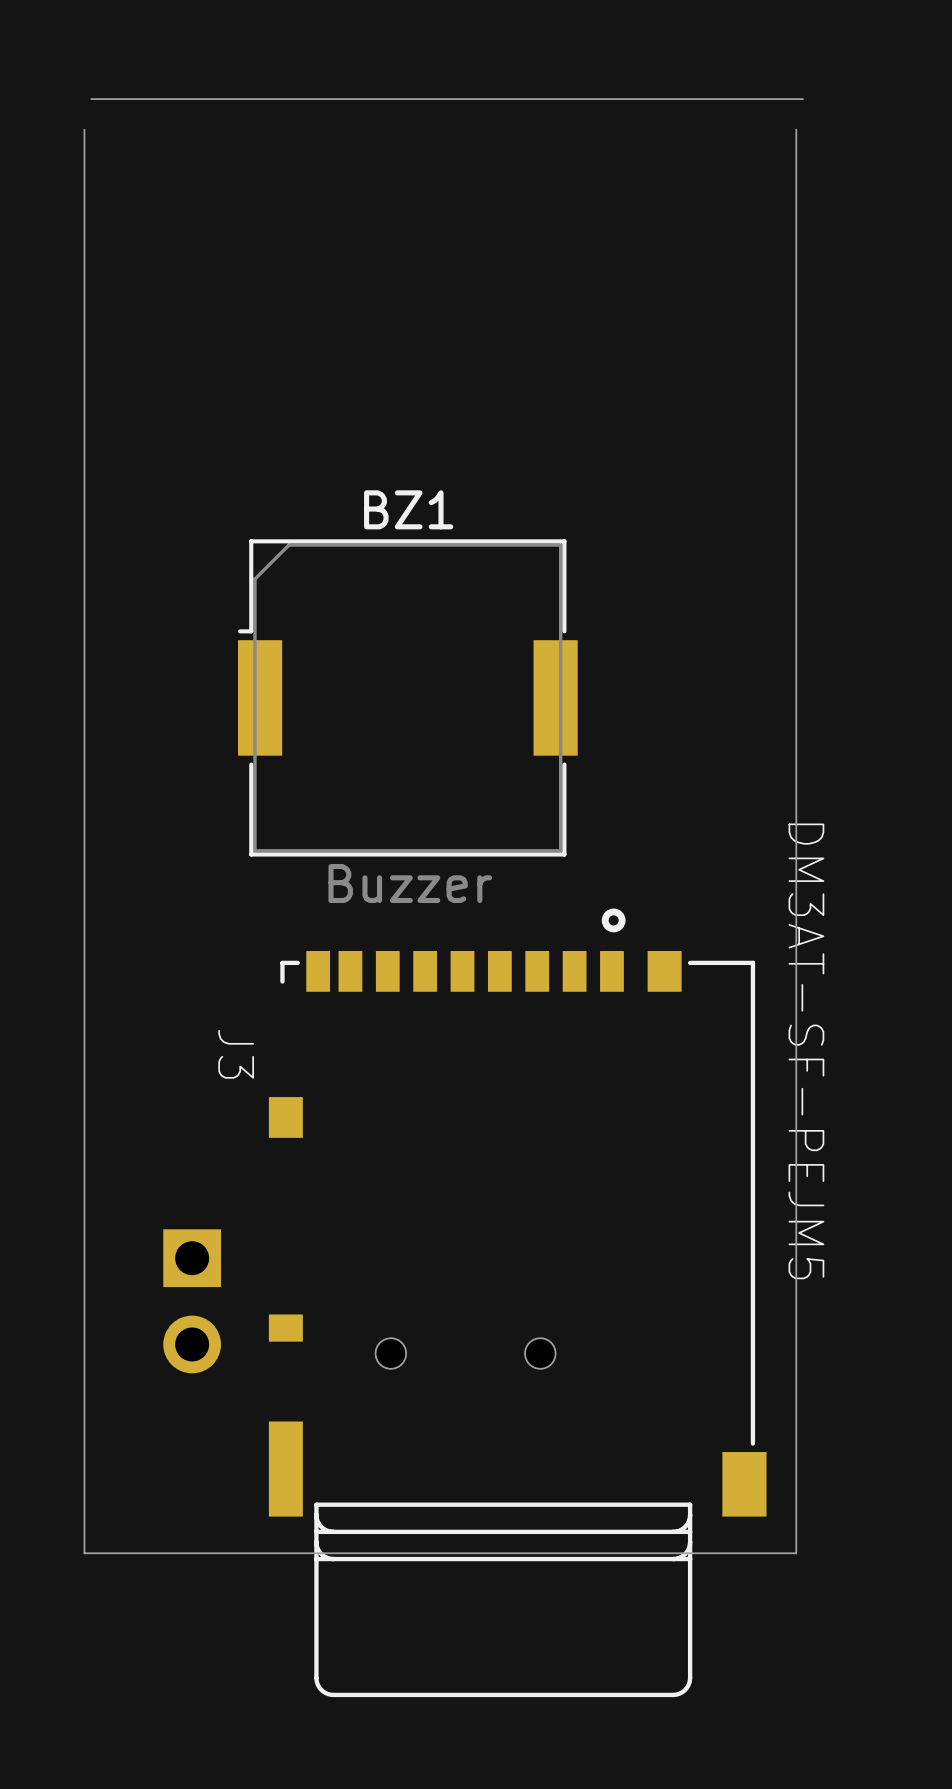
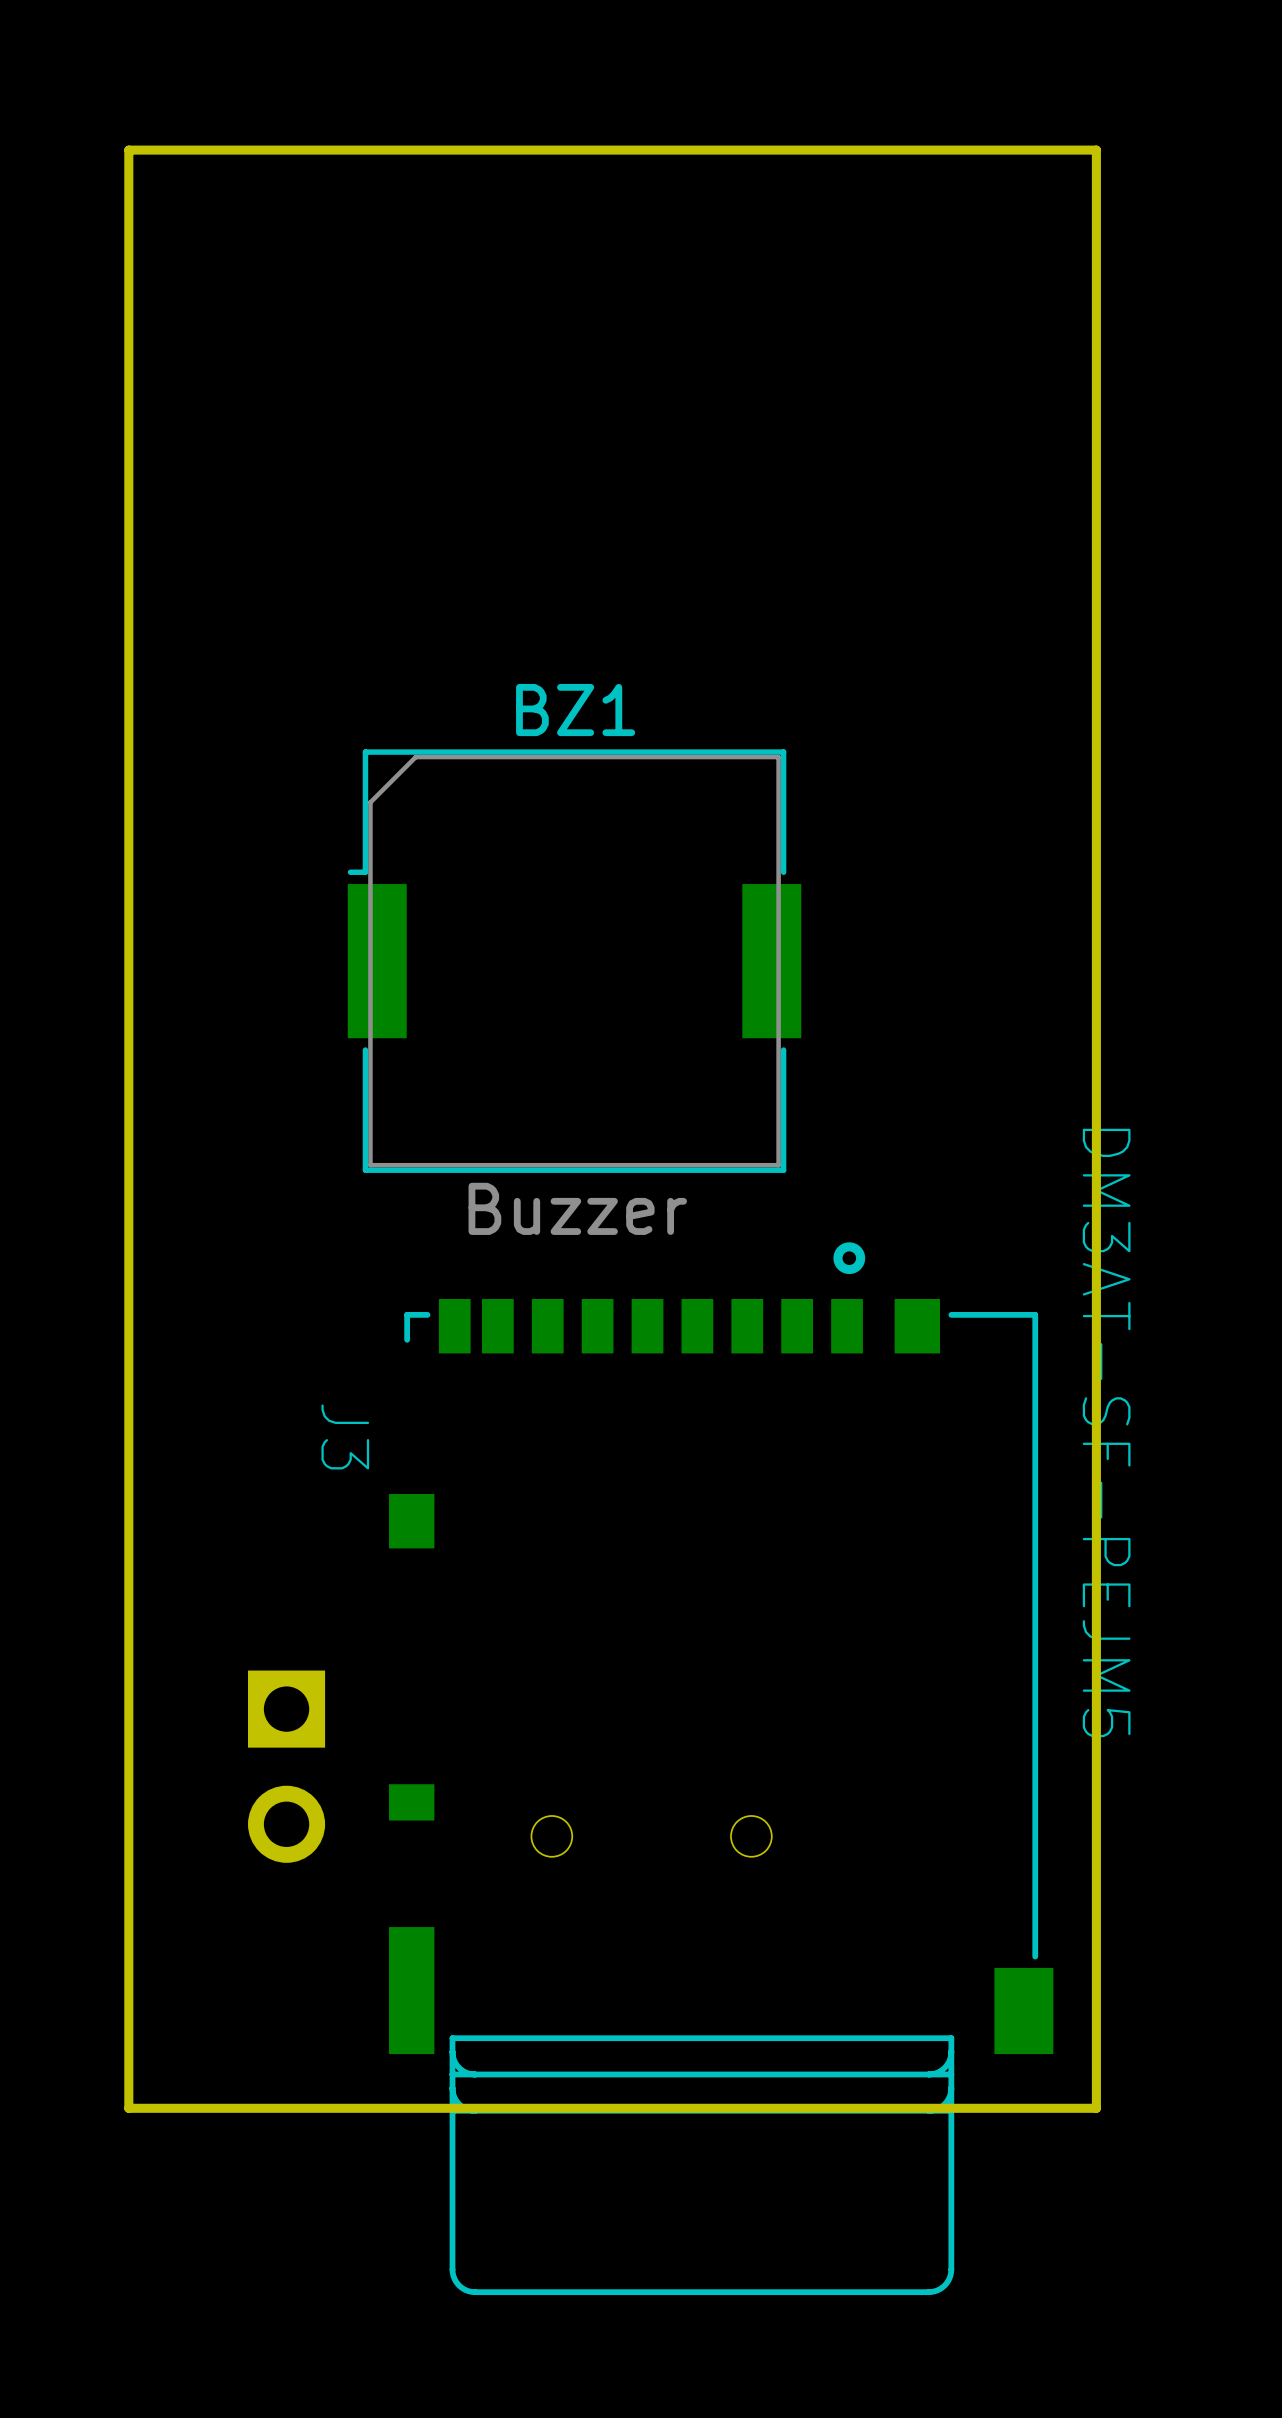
board edge: none -> (1096, 150) (128, 150) (128, 2108) (1096, 2108) (1096, 150)
board edge: (803, 99) (91, 99) -> none
board edge: (796, 129) (796, 1553) (84, 1553) (84, 129) -> none

